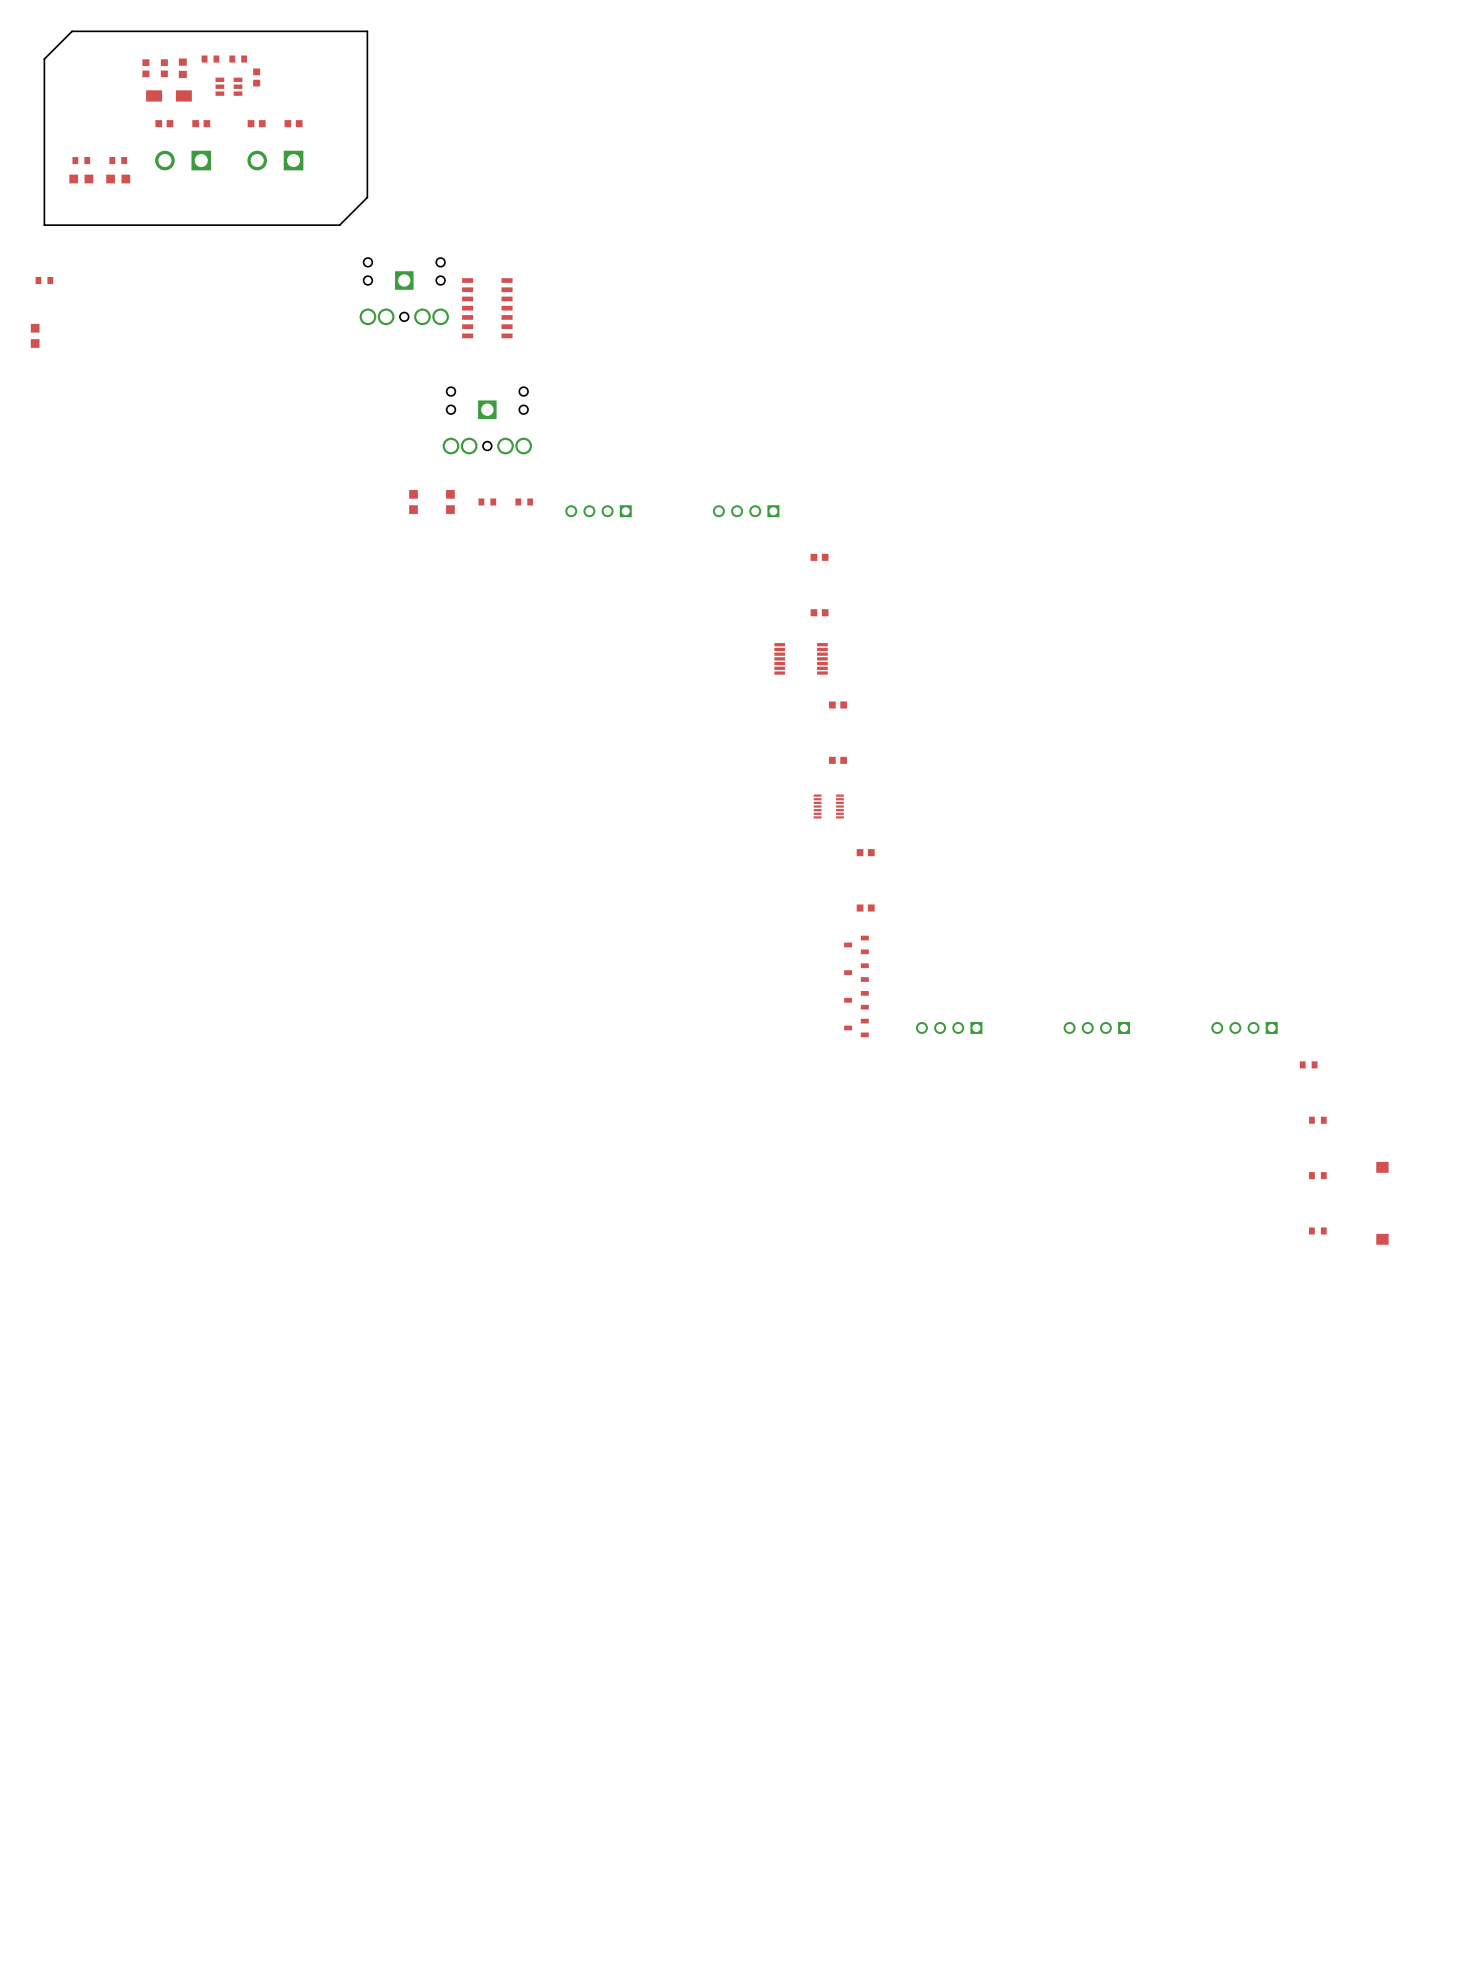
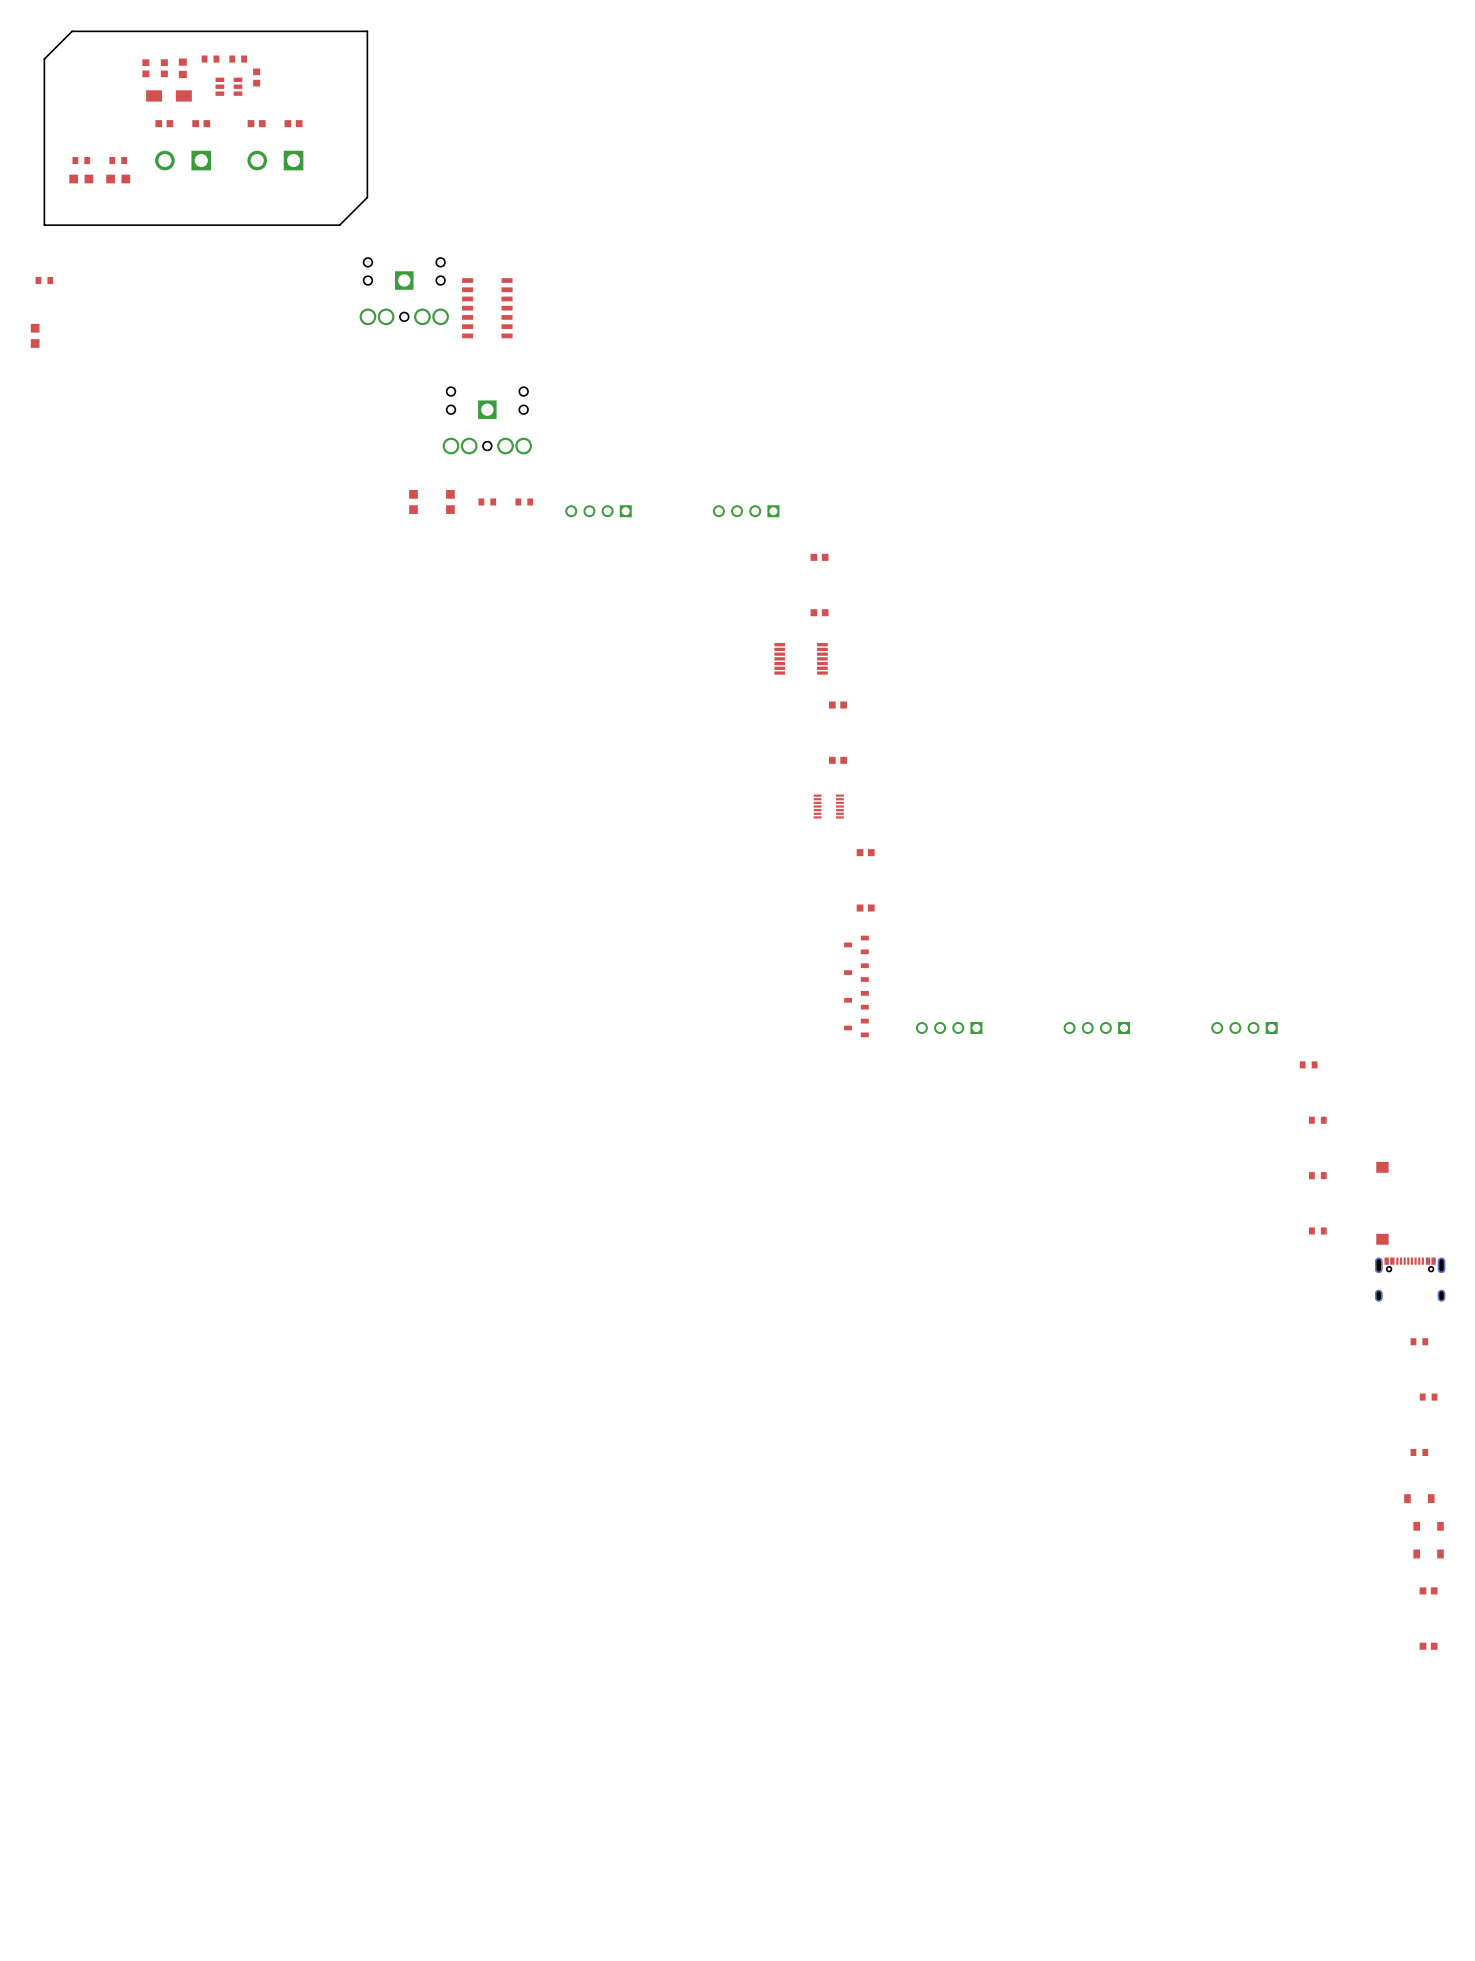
part: none -> (1410, 1279)
part: none -> (1419, 1341)
part: none -> (1428, 1397)
part: none -> (1419, 1452)
part: none -> (1419, 1498)
part: none -> (1428, 1526)
part: none -> (1428, 1553)
part: none -> (1428, 1590)
part: none -> (1428, 1646)

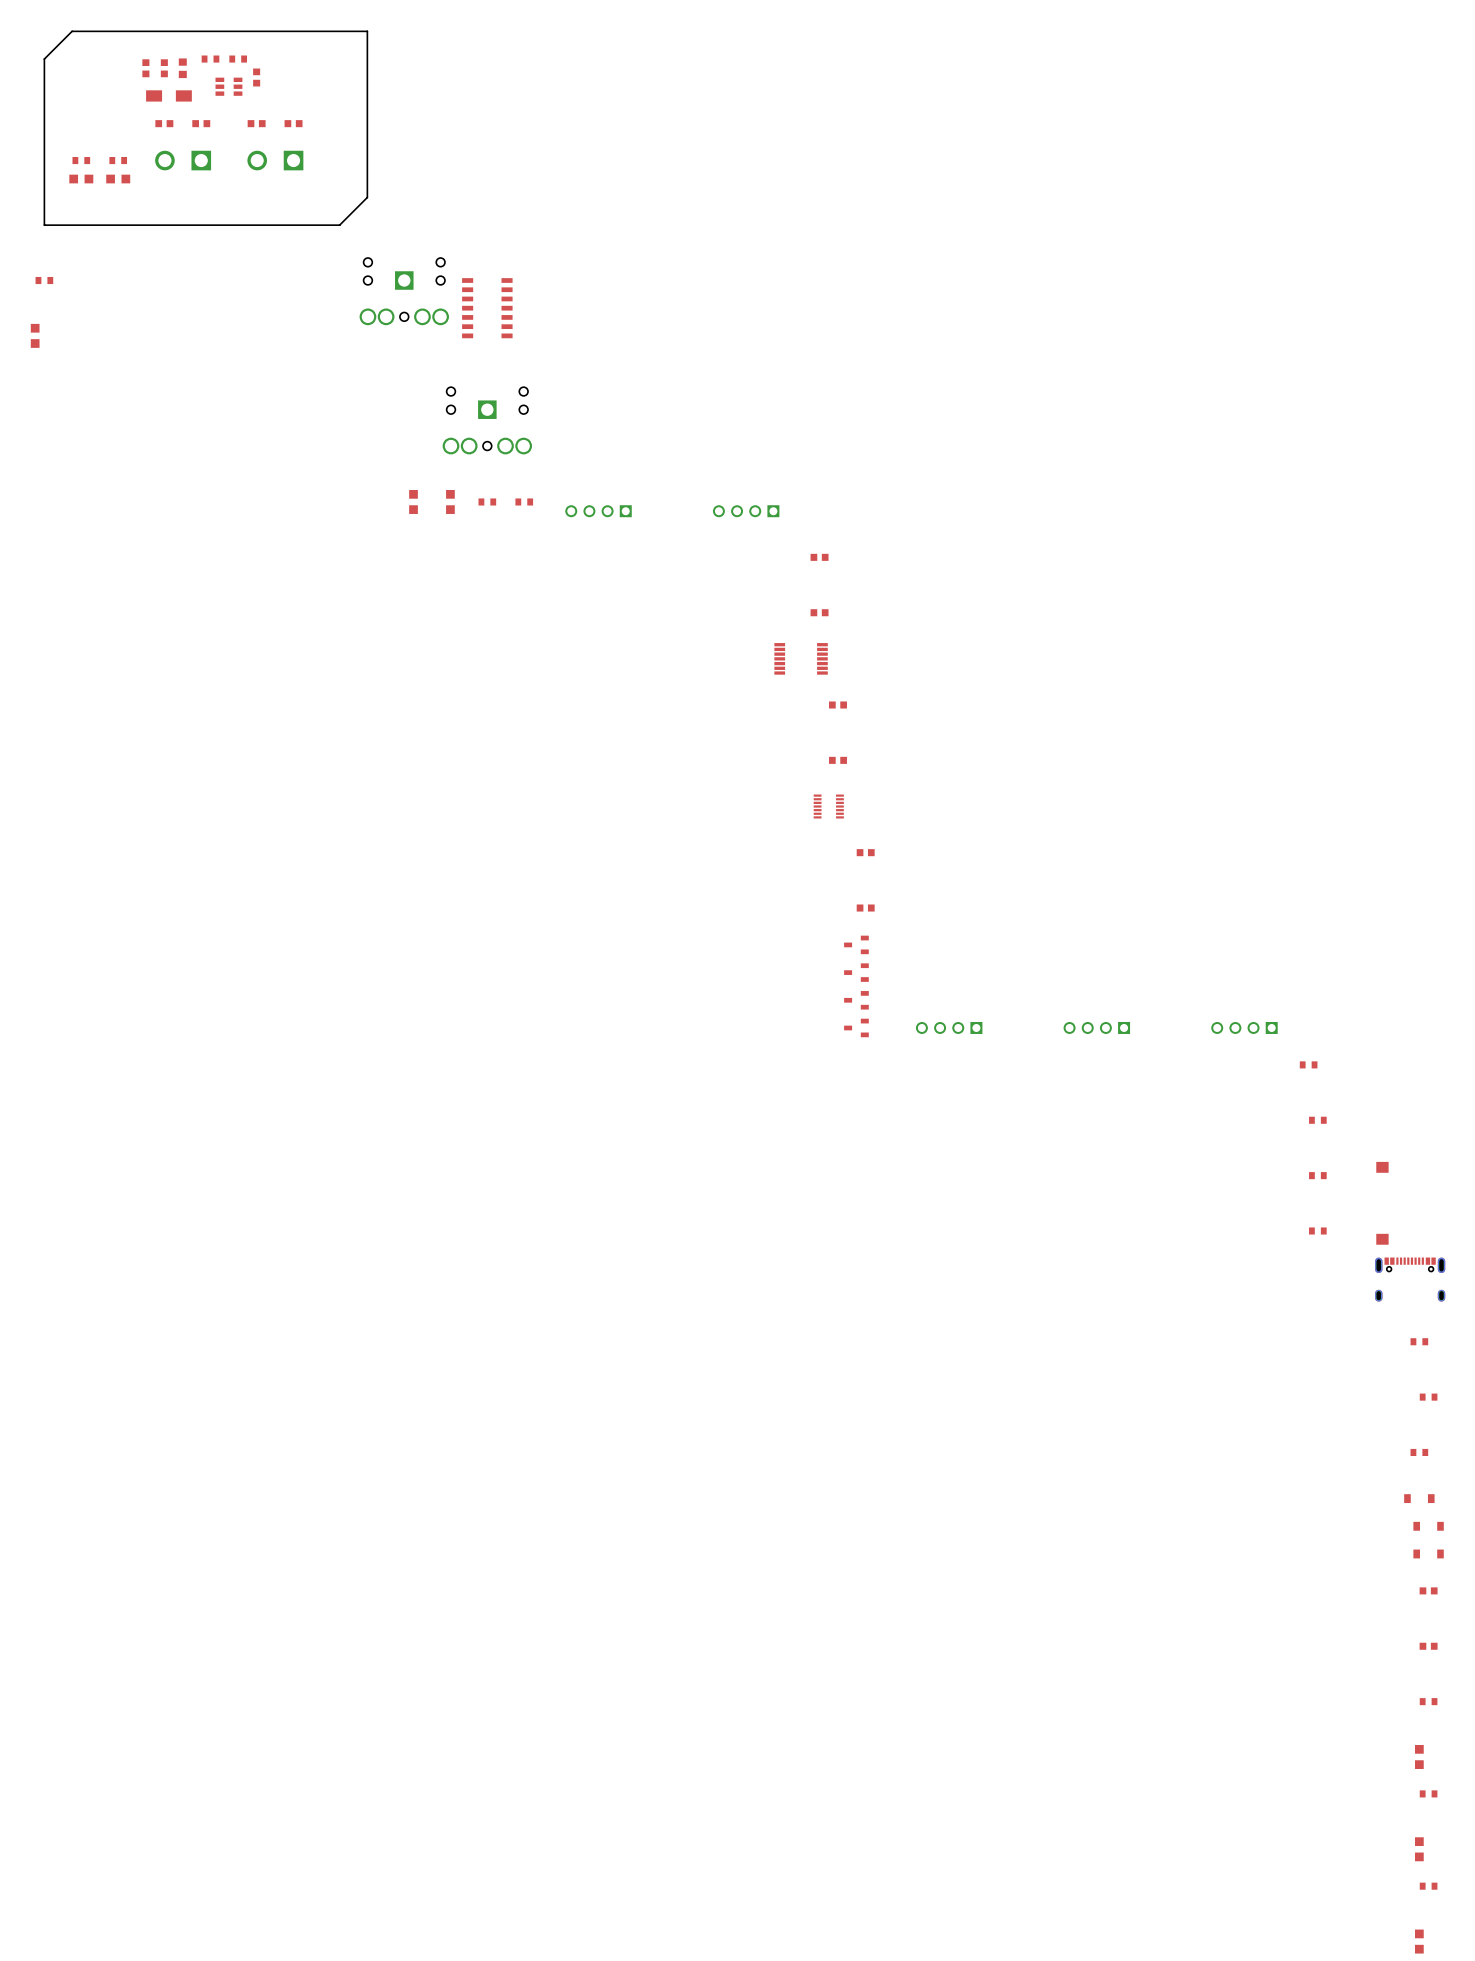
part: none -> (1428, 1701)
part: none -> (1419, 1756)
part: none -> (1428, 1793)
part: none -> (1419, 1849)
part: none -> (1428, 1886)
part: none -> (1419, 1941)

